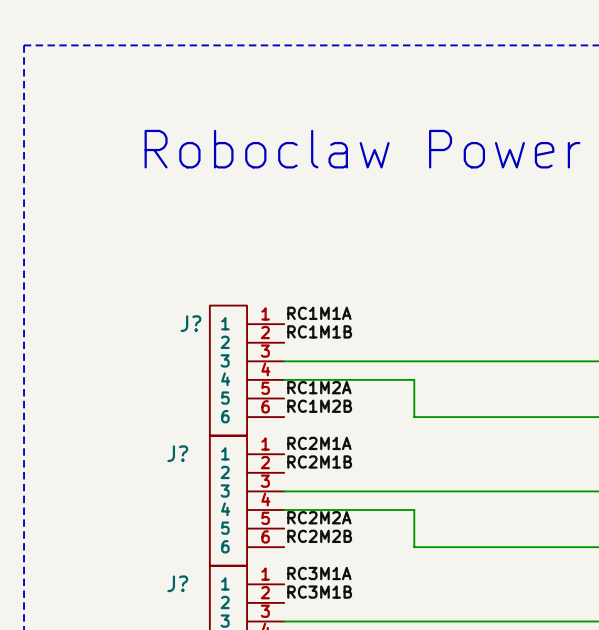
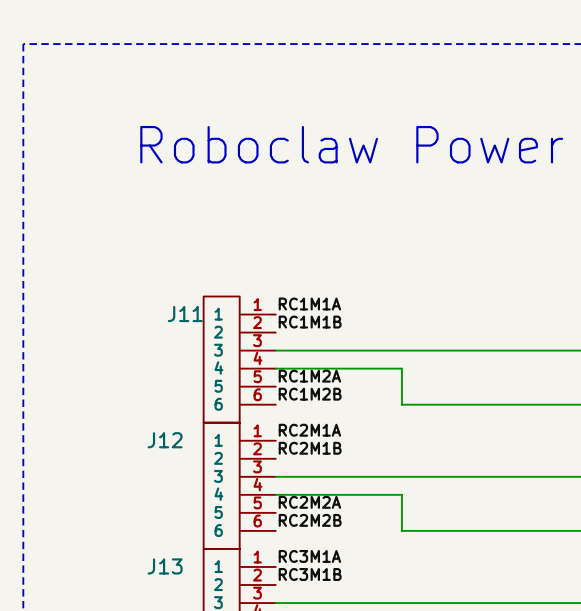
J? name: J? (190, 323) -> J11 (185, 314)
J? name: J? (177, 453) -> J12 (165, 440)
J? name: J? (177, 583) -> J13 (165, 566)

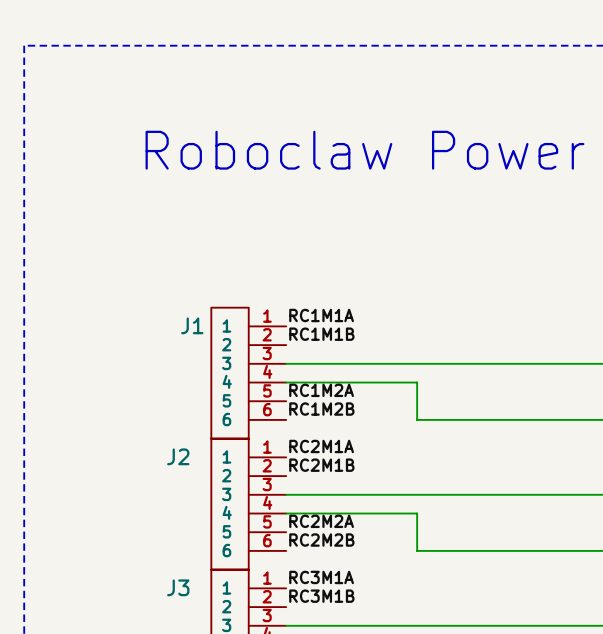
J11 name: J11 (185, 314) -> J1 (192, 325)
J12 name: J12 (165, 440) -> J2 (178, 456)
J13 name: J13 (165, 566) -> J3 (178, 587)

